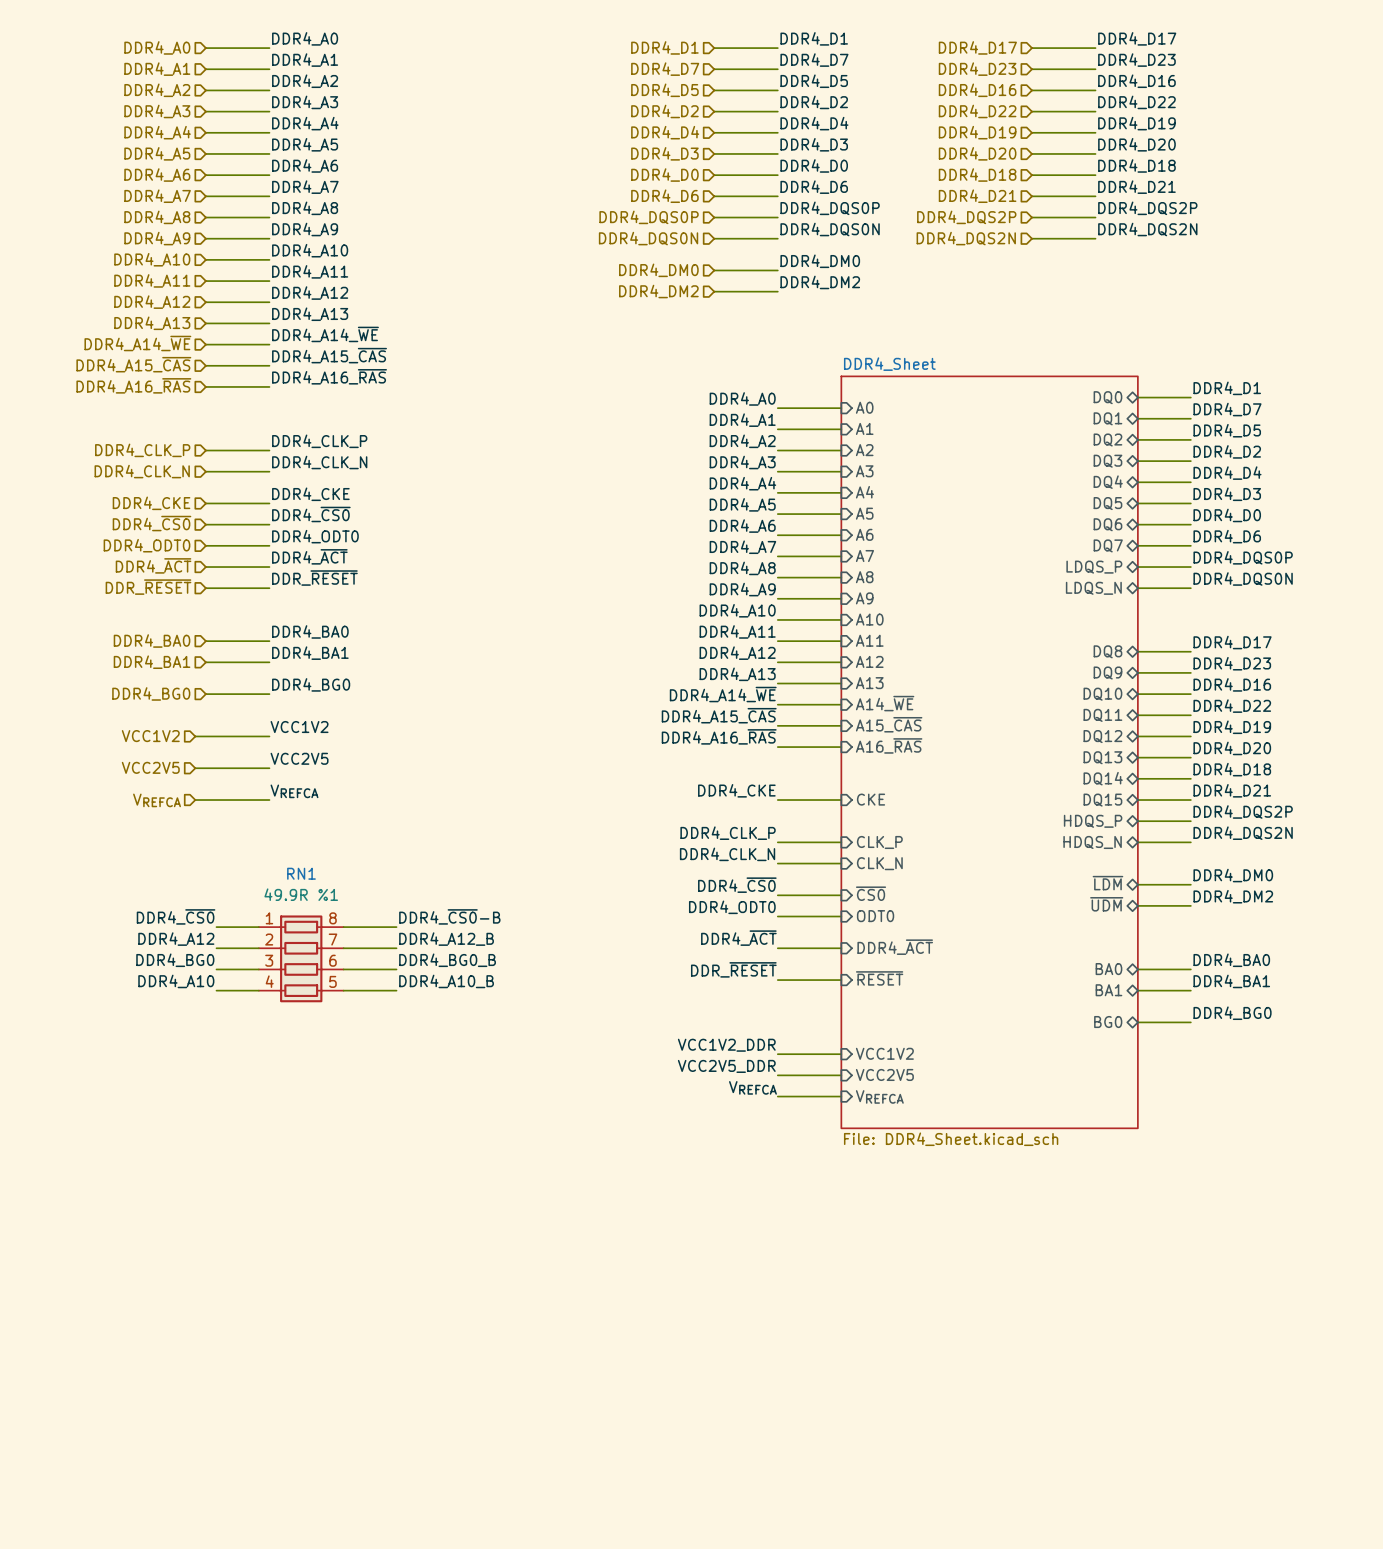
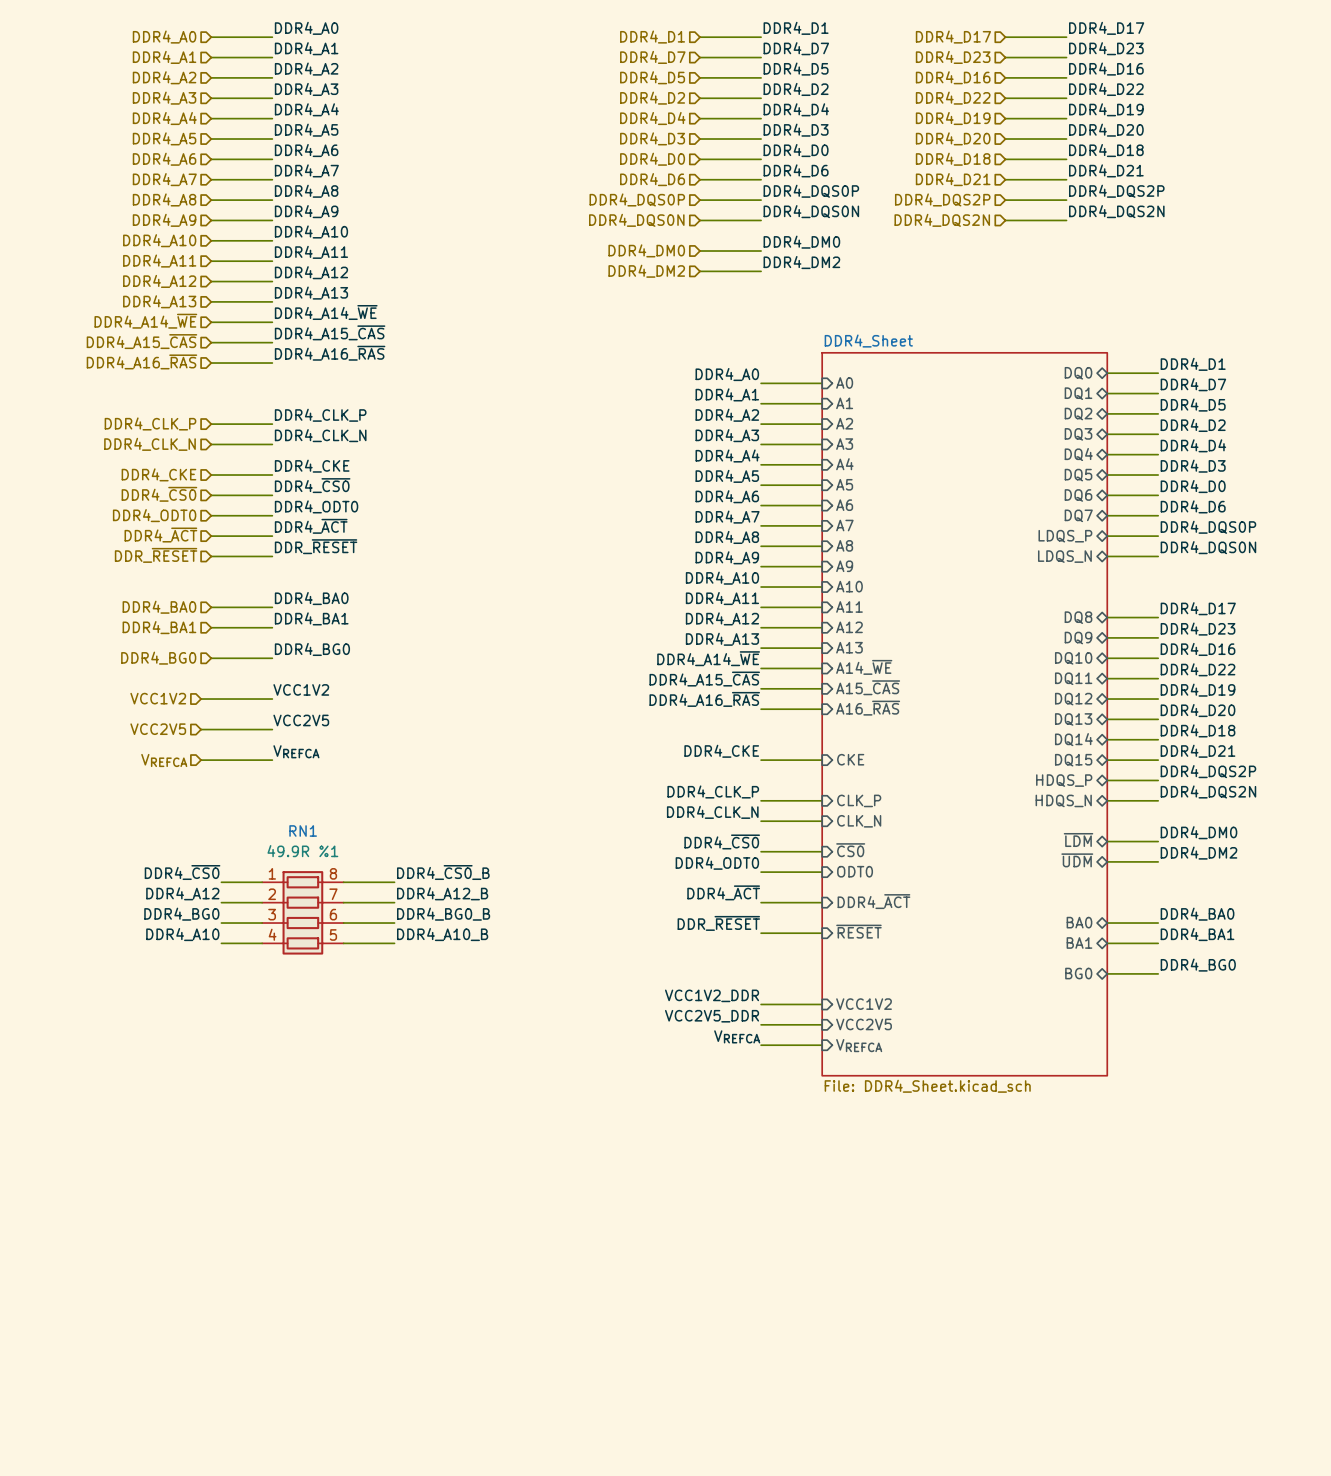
label: DDR4_~{CS0}-B (449, 916) -> DDR4_~{CS0}_B (443, 872)

